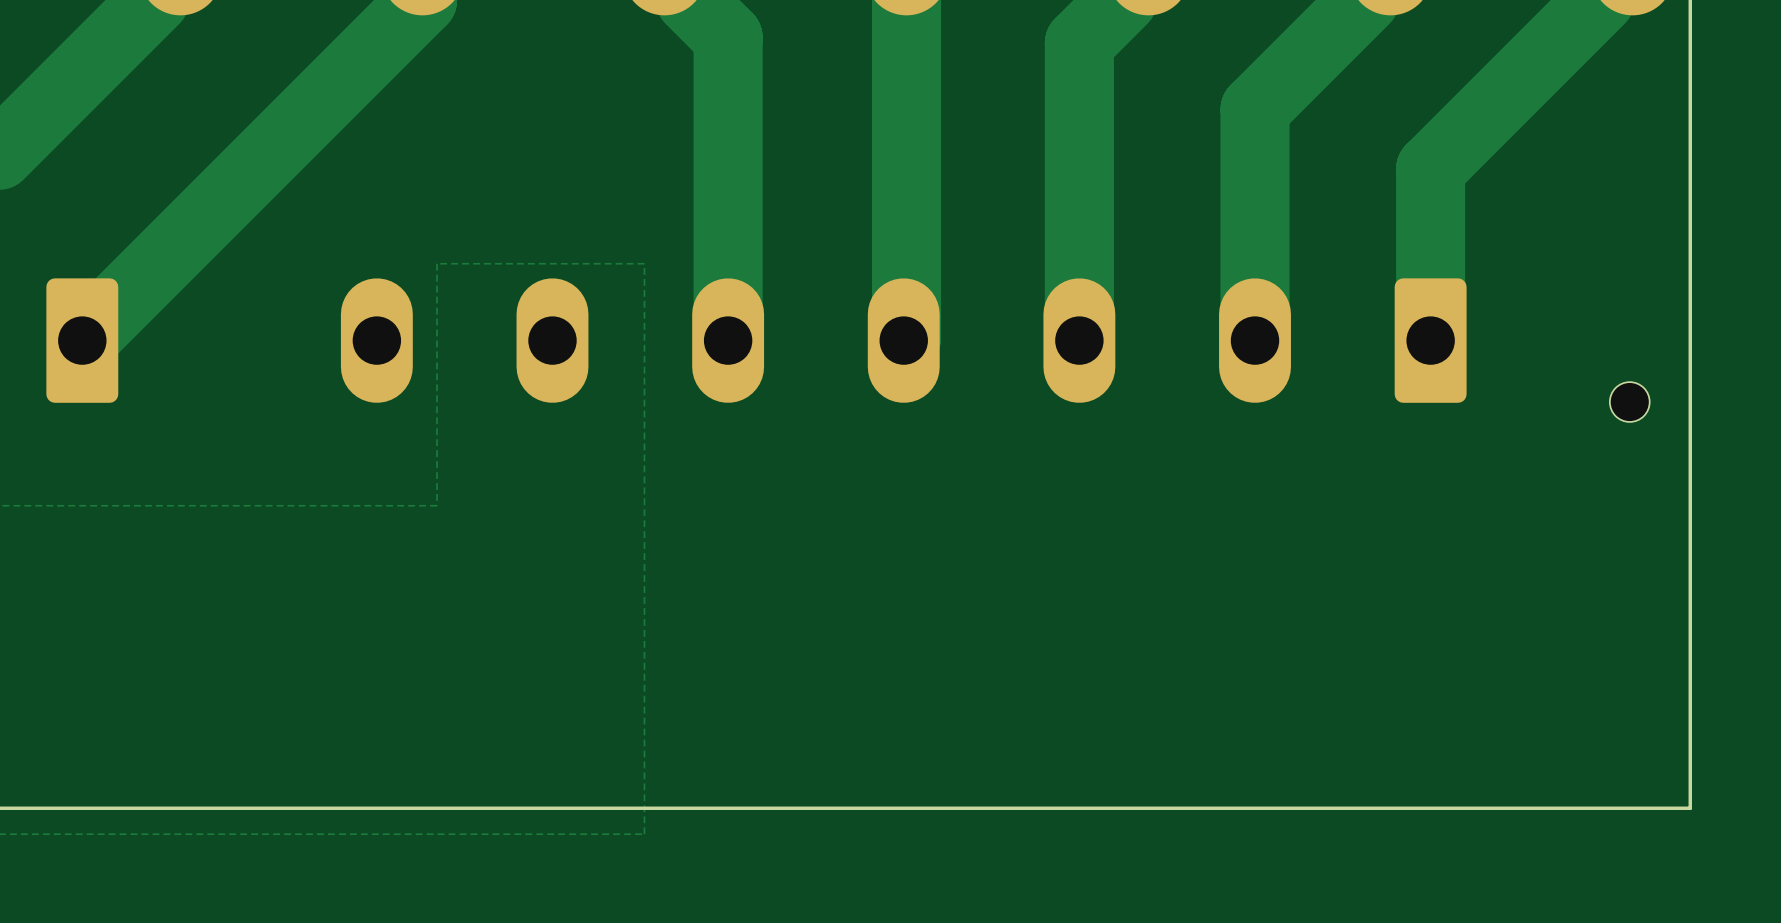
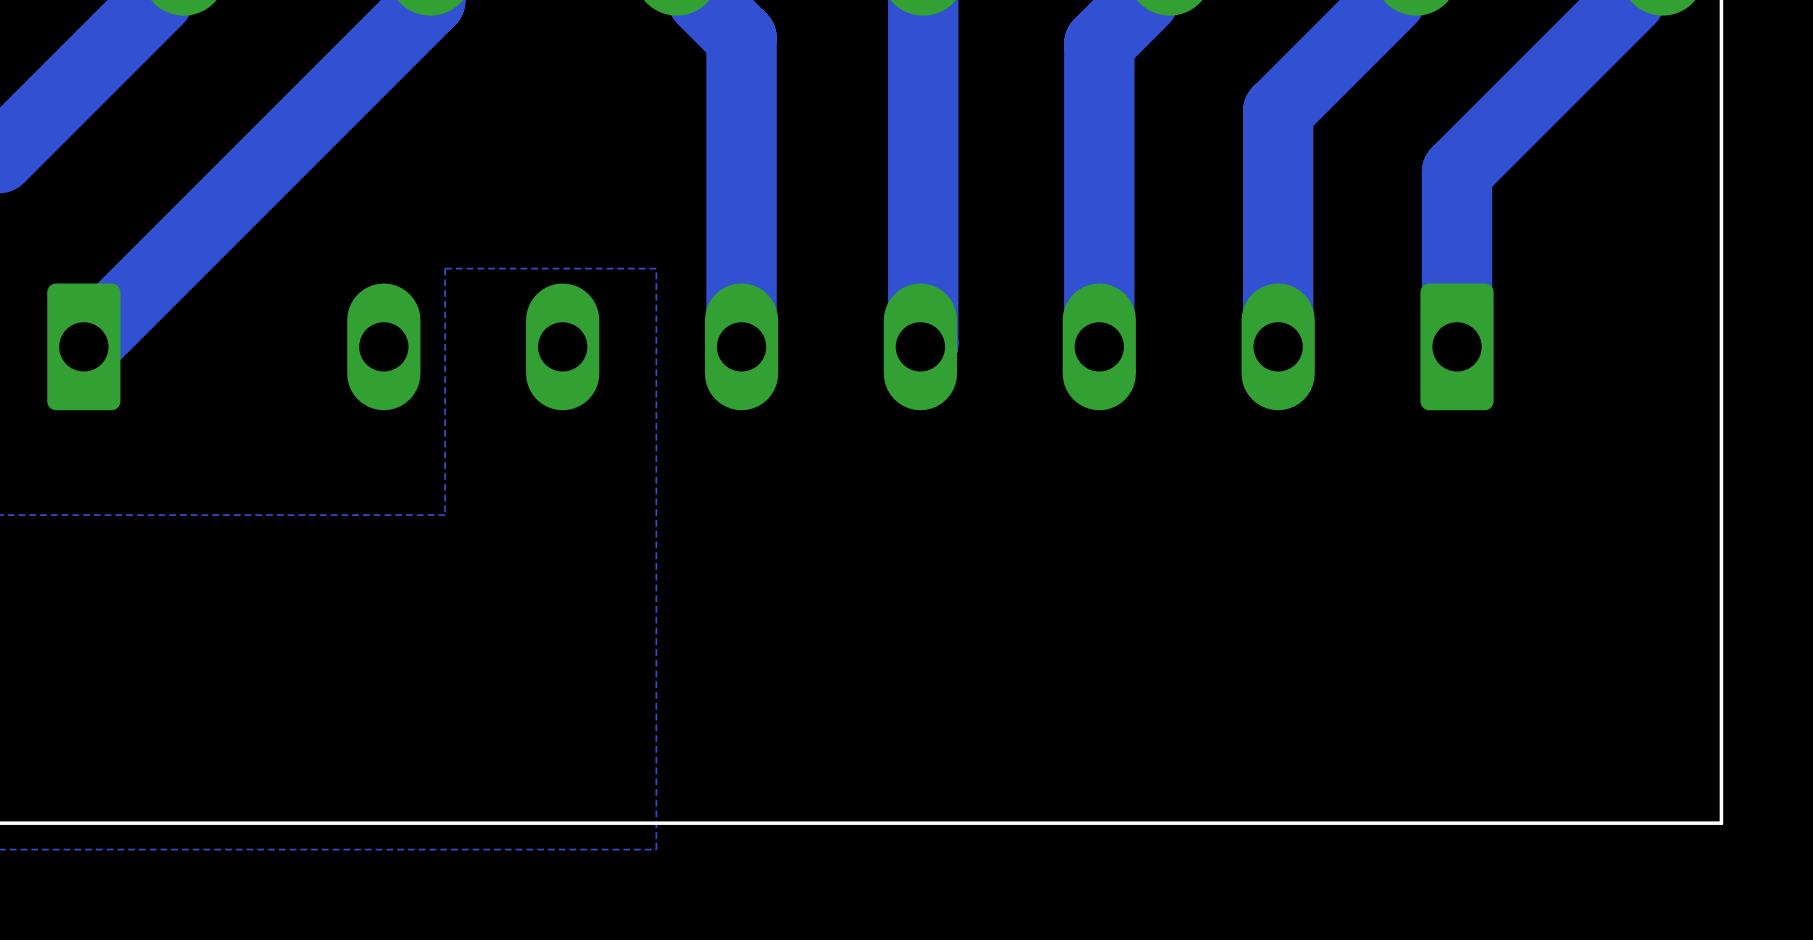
part: (1629, 402) -> none

